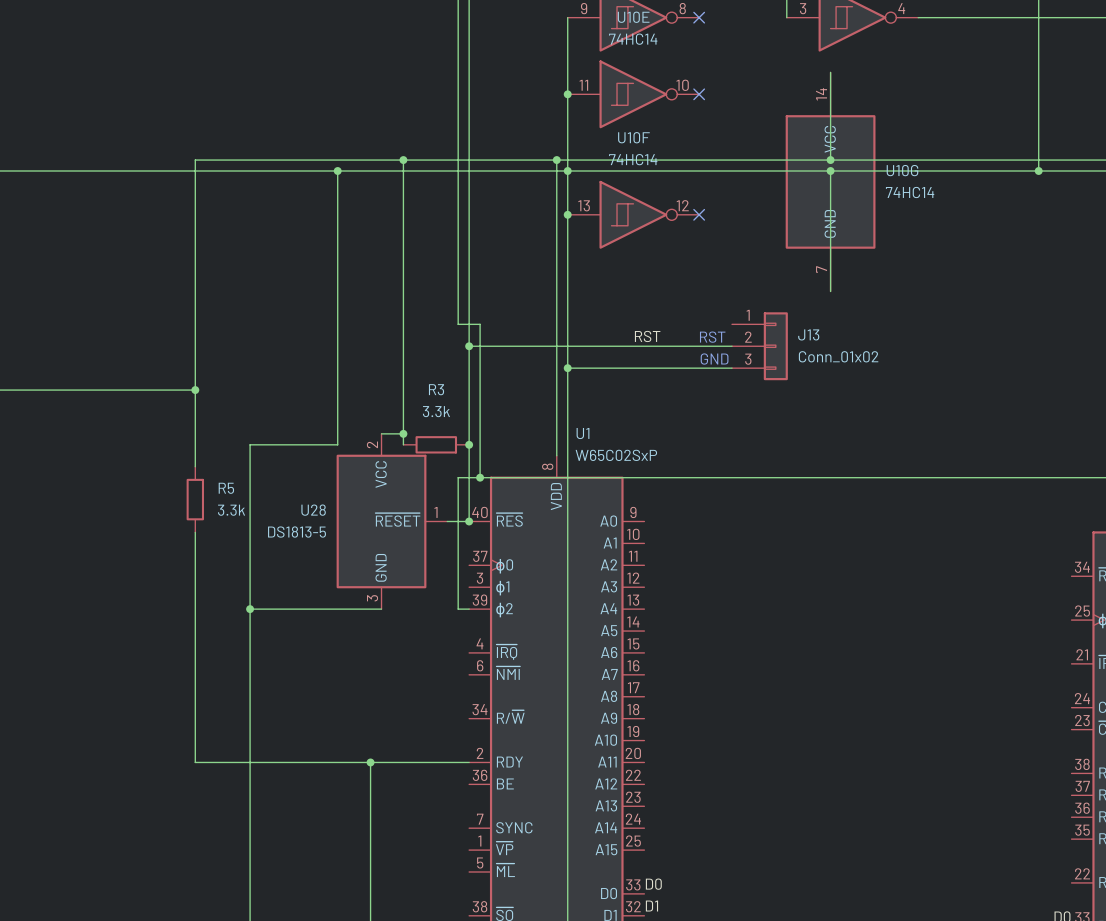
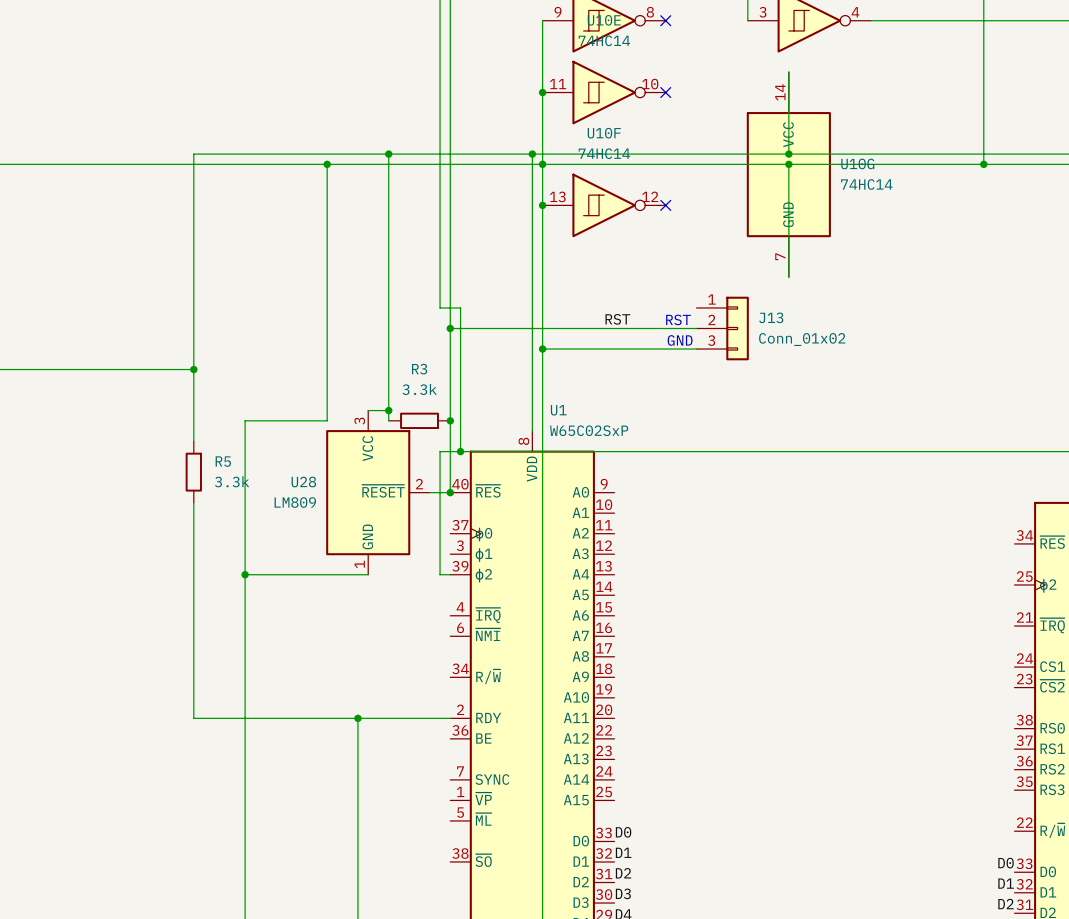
U28 pin number: 2 (372, 444) -> 3 (359, 421)
U28 pin number: 1 (436, 512) -> 2 (419, 484)
U28 value: DS1813-5 (297, 532) -> LM809 (295, 502)
U28 pin number: 3 (372, 598) -> 1 (359, 564)

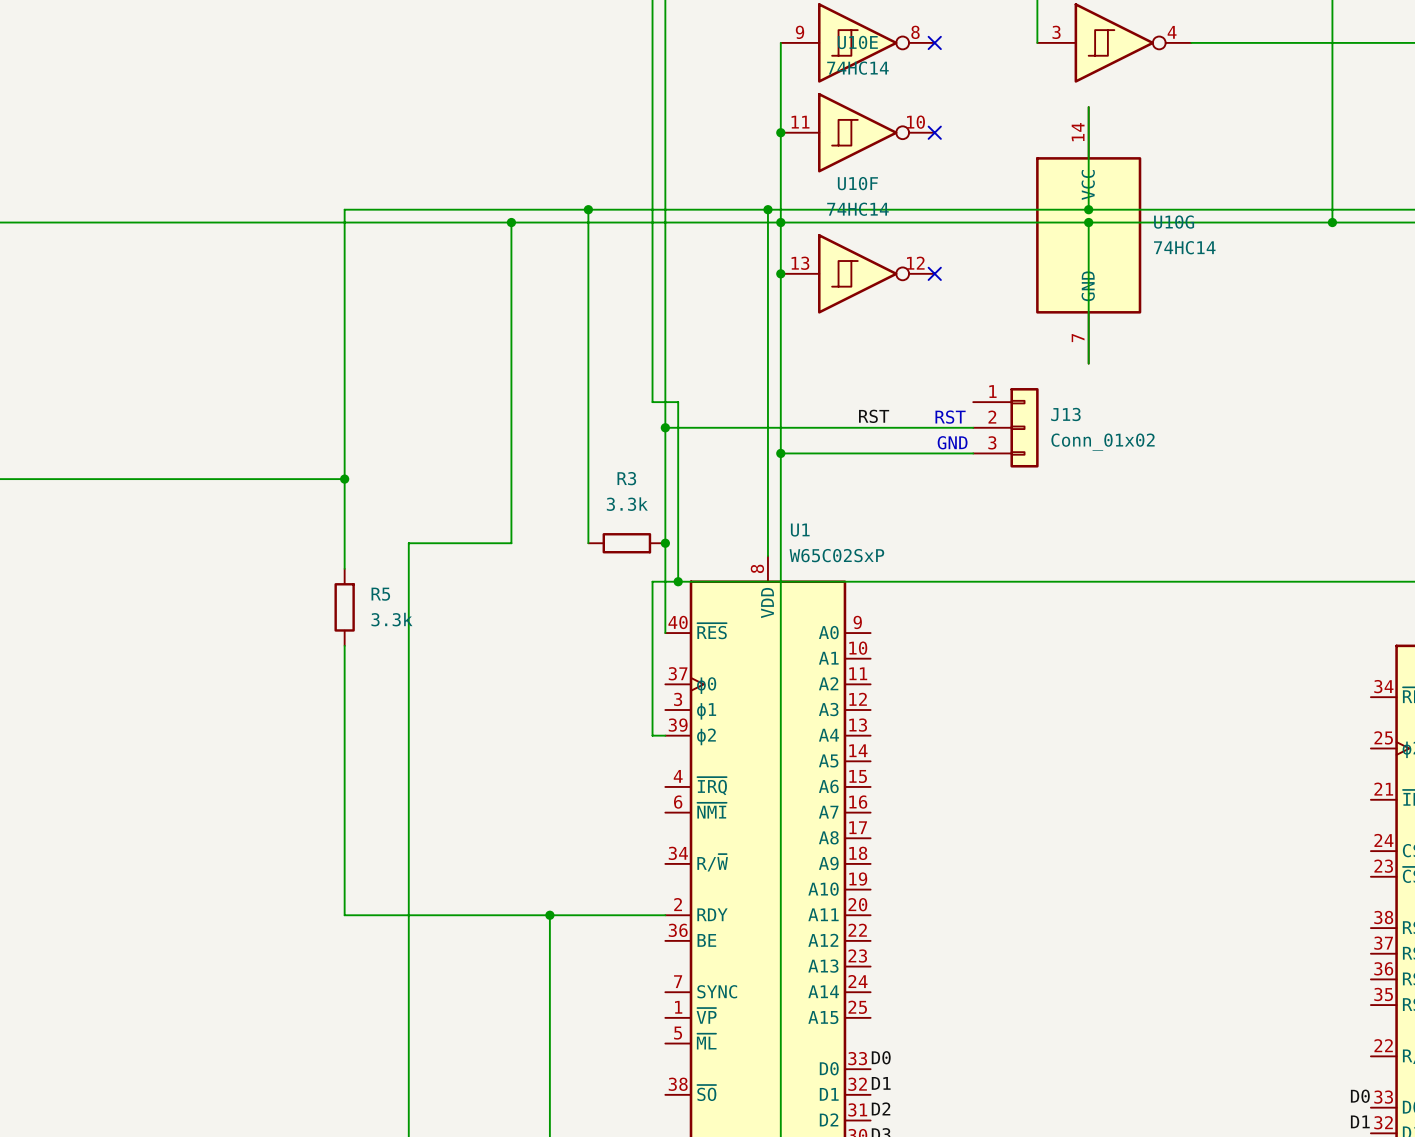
wire: (368, 410) (388, 410) -> none
junction: (388, 410) -> none
U28: LM809 (377, 492) -> none
wire: (429, 492) (450, 492) -> none
junction: (450, 492) -> none
wire: (245, 574) (368, 574) -> none
junction: (245, 574) -> none

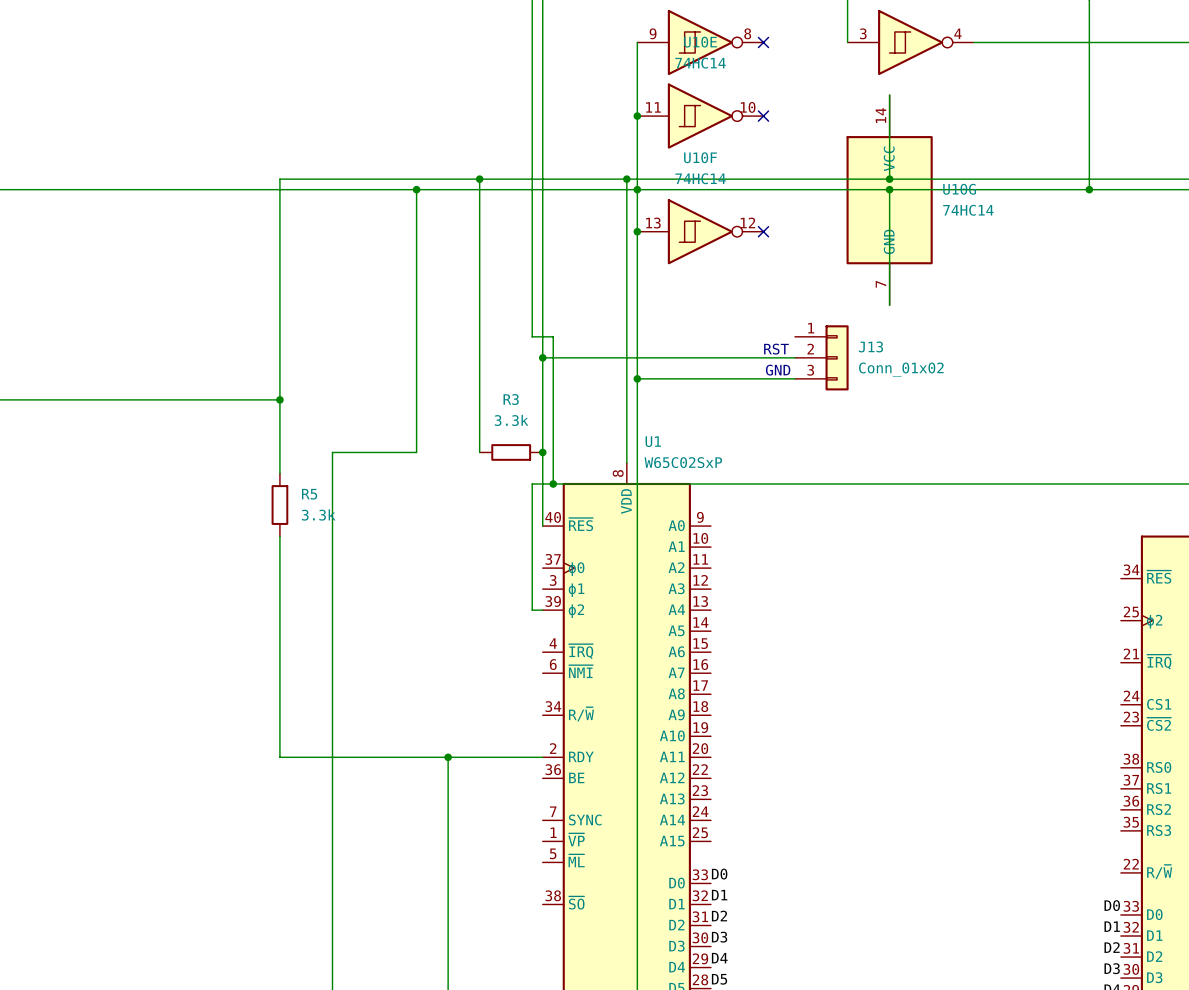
label: RST (874, 416) -> none

